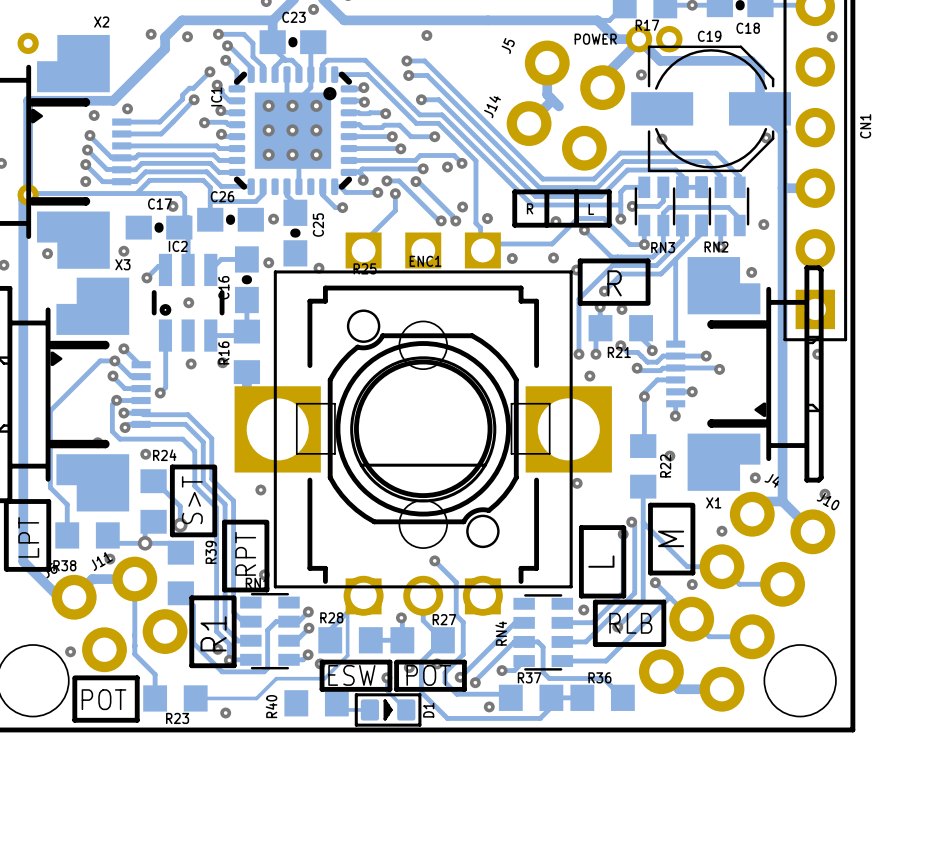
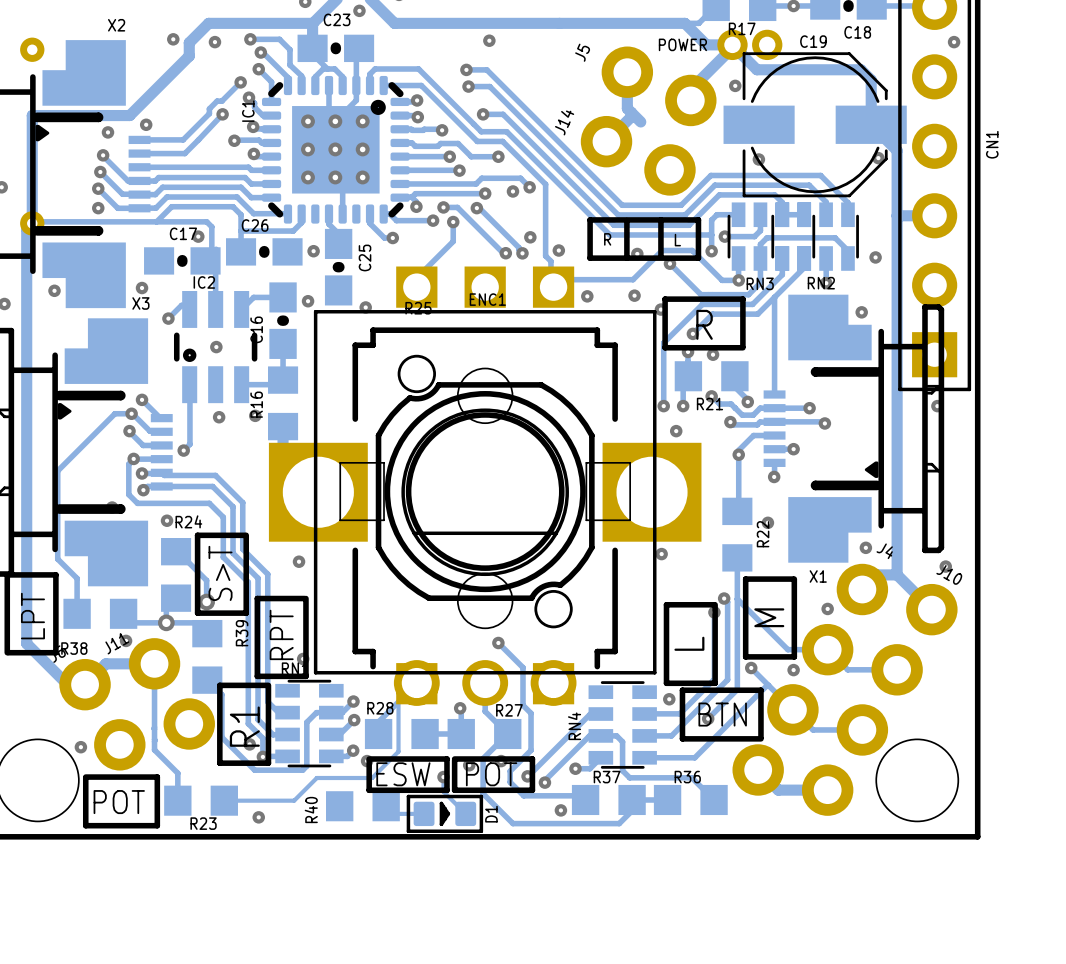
text: RLB (630, 623) -> BTN (722, 714)

